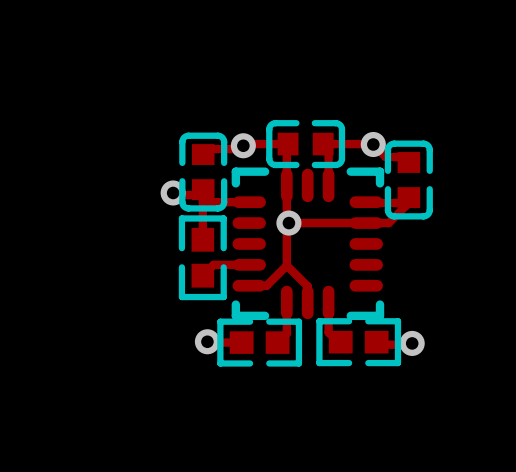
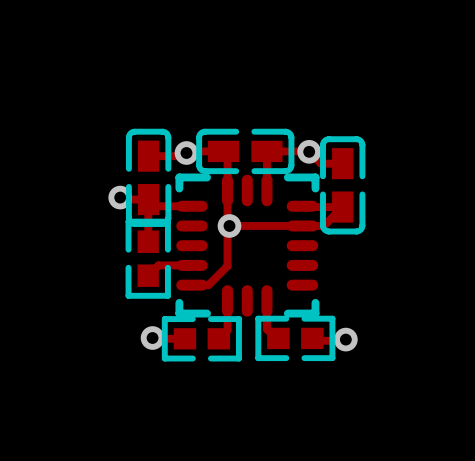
part footprint: [266, 120, 346, 169] -> [196, 128, 295, 175]
part footprint: [179, 132, 228, 212] -> [125, 128, 172, 227]
part footprint: [384, 140, 433, 220] -> [320, 136, 366, 235]
top track: (286, 265) (307, 286) (307, 302) -> none

